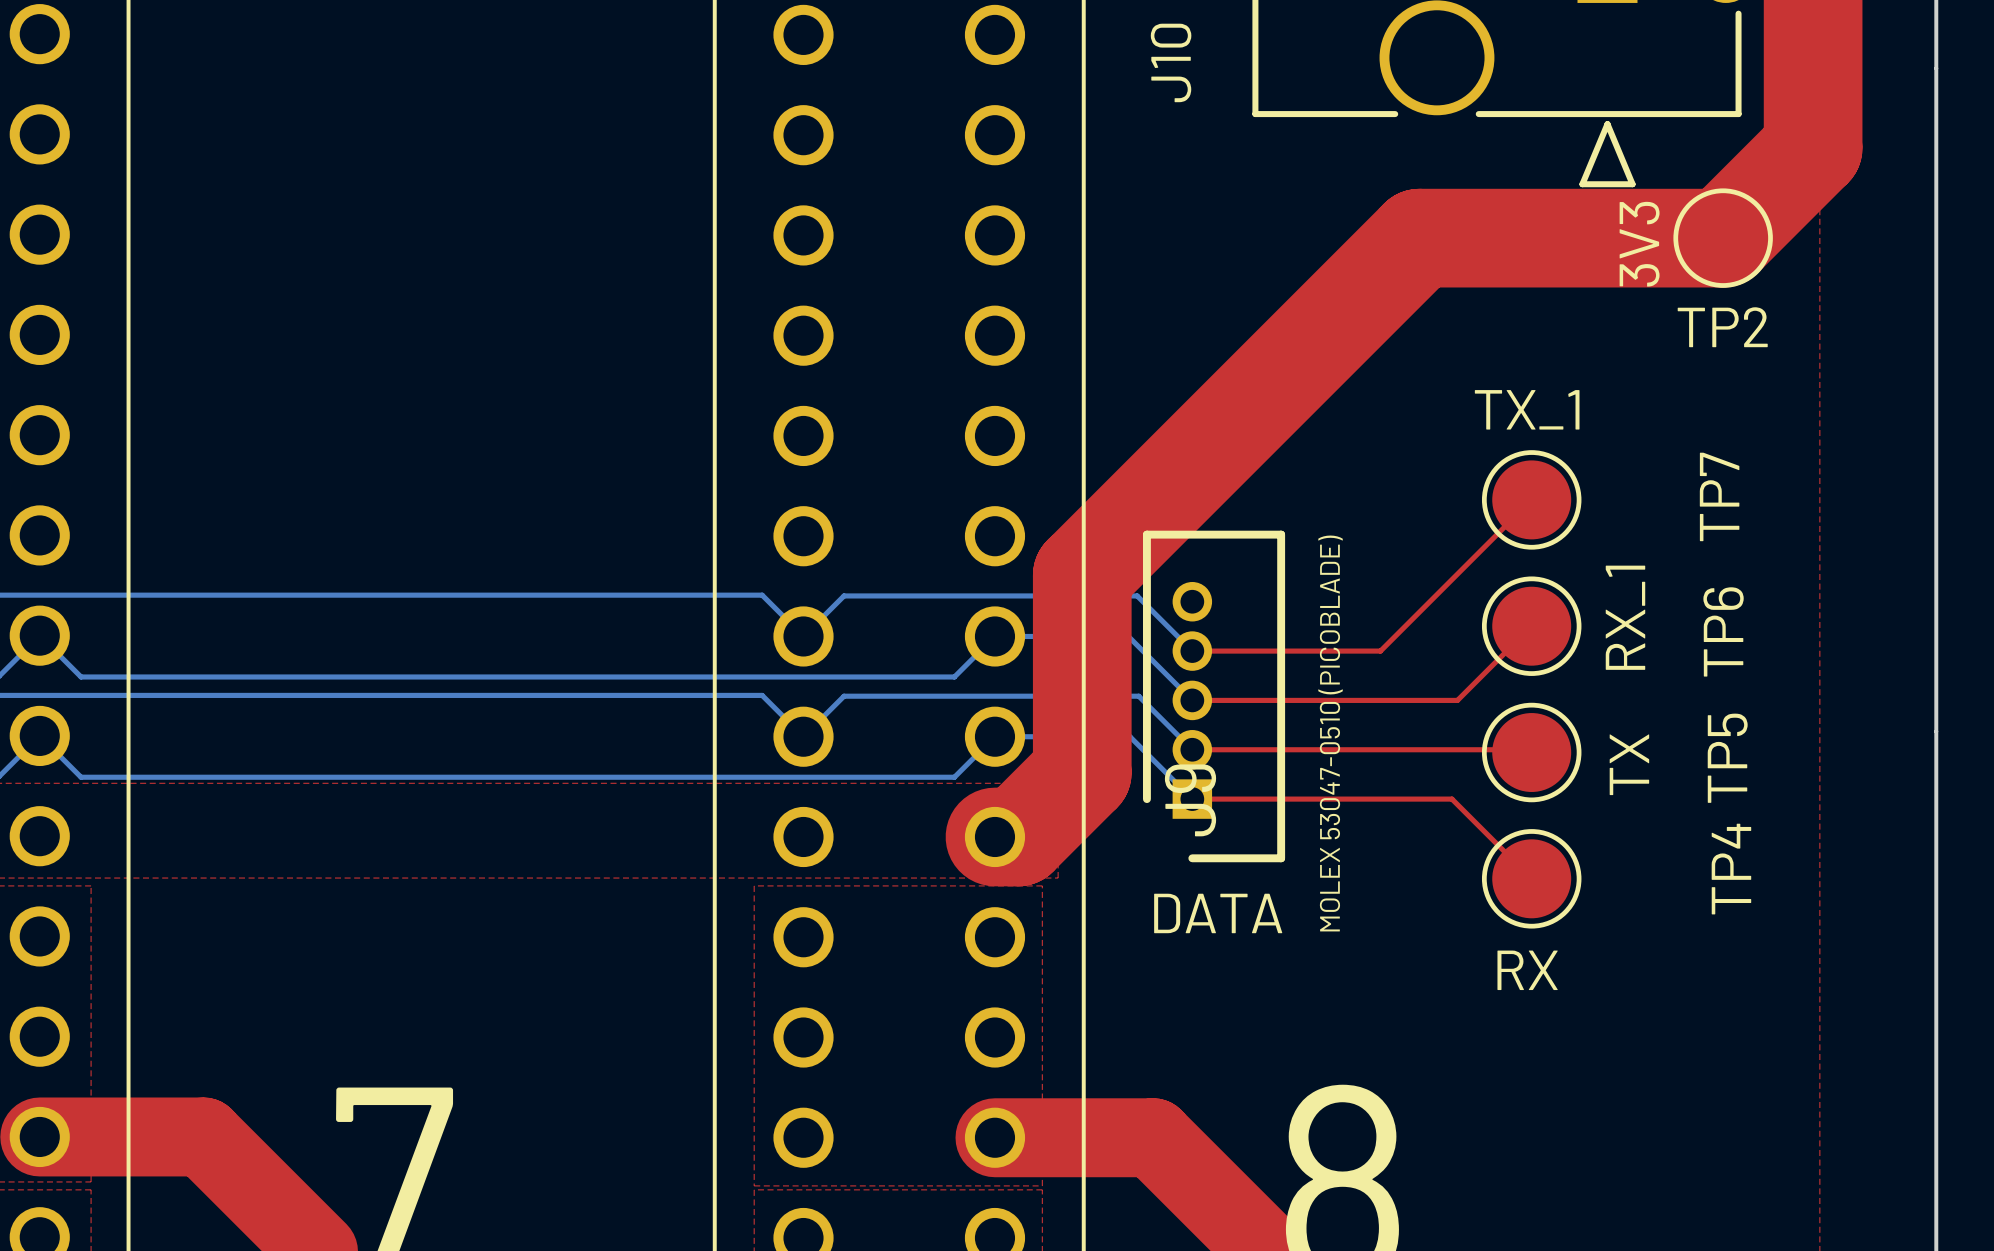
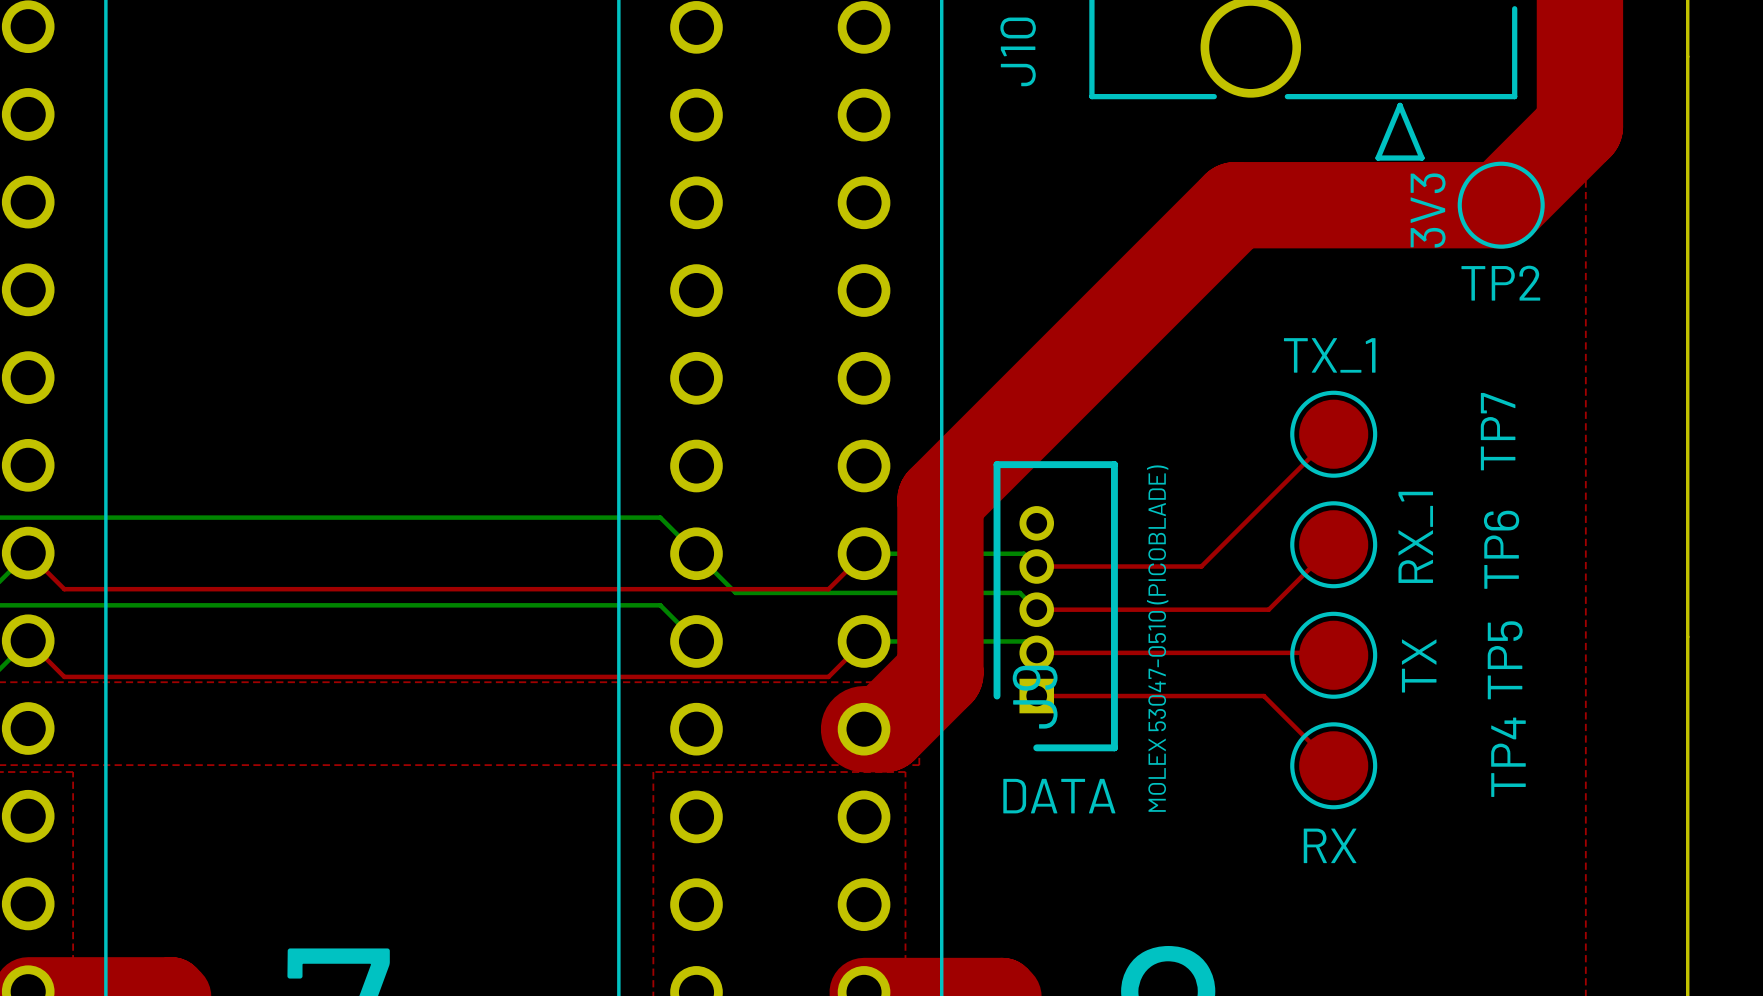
top track: none -> (28, 553) (64, 589) (828, 589) (864, 553)
bottom track: (39, 635) (81, 676) (954, 676) (994, 636) -> none
bottom track: (803, 636) (844, 595) (1137, 595) (1177, 636) -> (696, 553) (735, 592) (1019, 592)
bottom track: (1128, 636) (1173, 681) -> (980, 553) (1023, 553)
top track: none -> (28, 640) (64, 676) (828, 676) (864, 641)
bottom track: (39, 735) (81, 777) (954, 777) (994, 736) -> none
bottom track: (803, 736) (844, 696) (1138, 696) (1179, 736) -> none
bottom track: (1129, 736) (1192, 799) -> (982, 641) (1025, 641)

